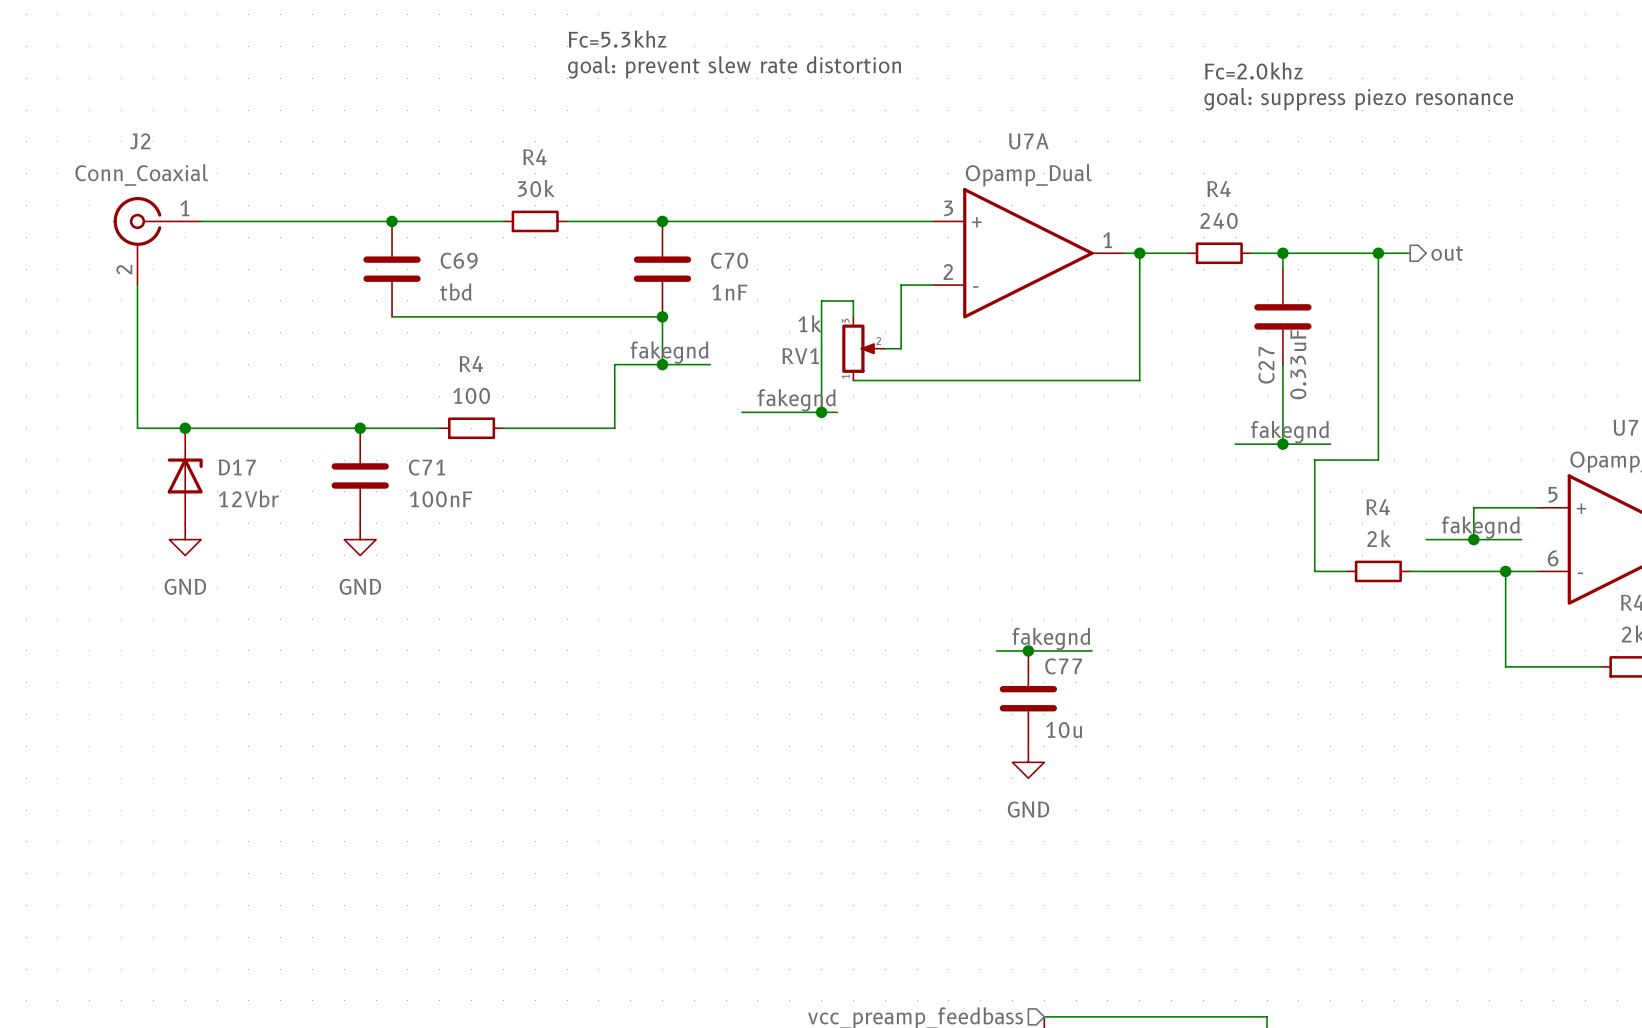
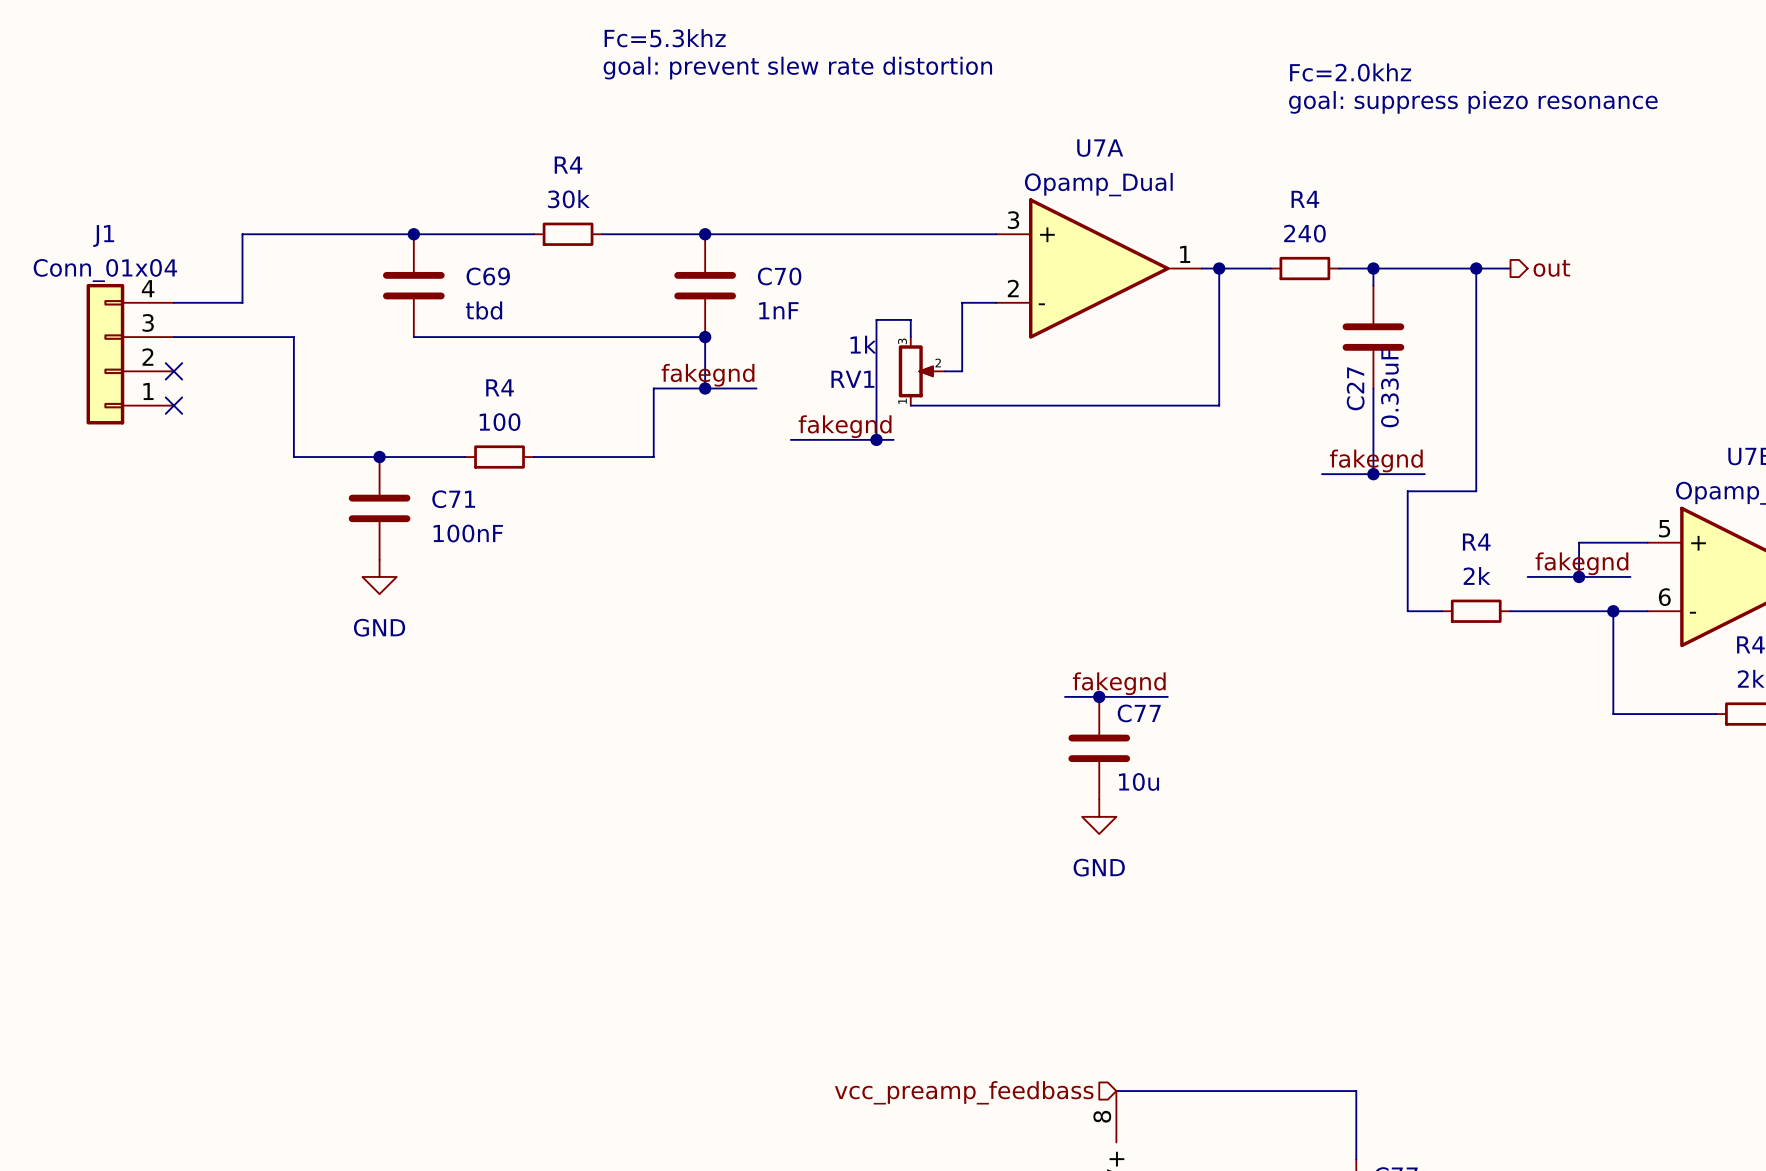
wire: (201, 221) (232, 221) -> (173, 302) (242, 302) (242, 234)
J2: Conn_Coaxial (157, 241) -> none
wire: (137, 285) (137, 428) (280, 428) -> (173, 337) (293, 337) (293, 457)
J1: none -> Conn_01x04 (130, 354)
no-connect mark: none -> (173, 371)
no-connect mark: none -> (173, 405)
junction: (185, 428) -> none
D17: 12Vbr (185, 475) -> none
power symbol: GND (185, 539) -> none

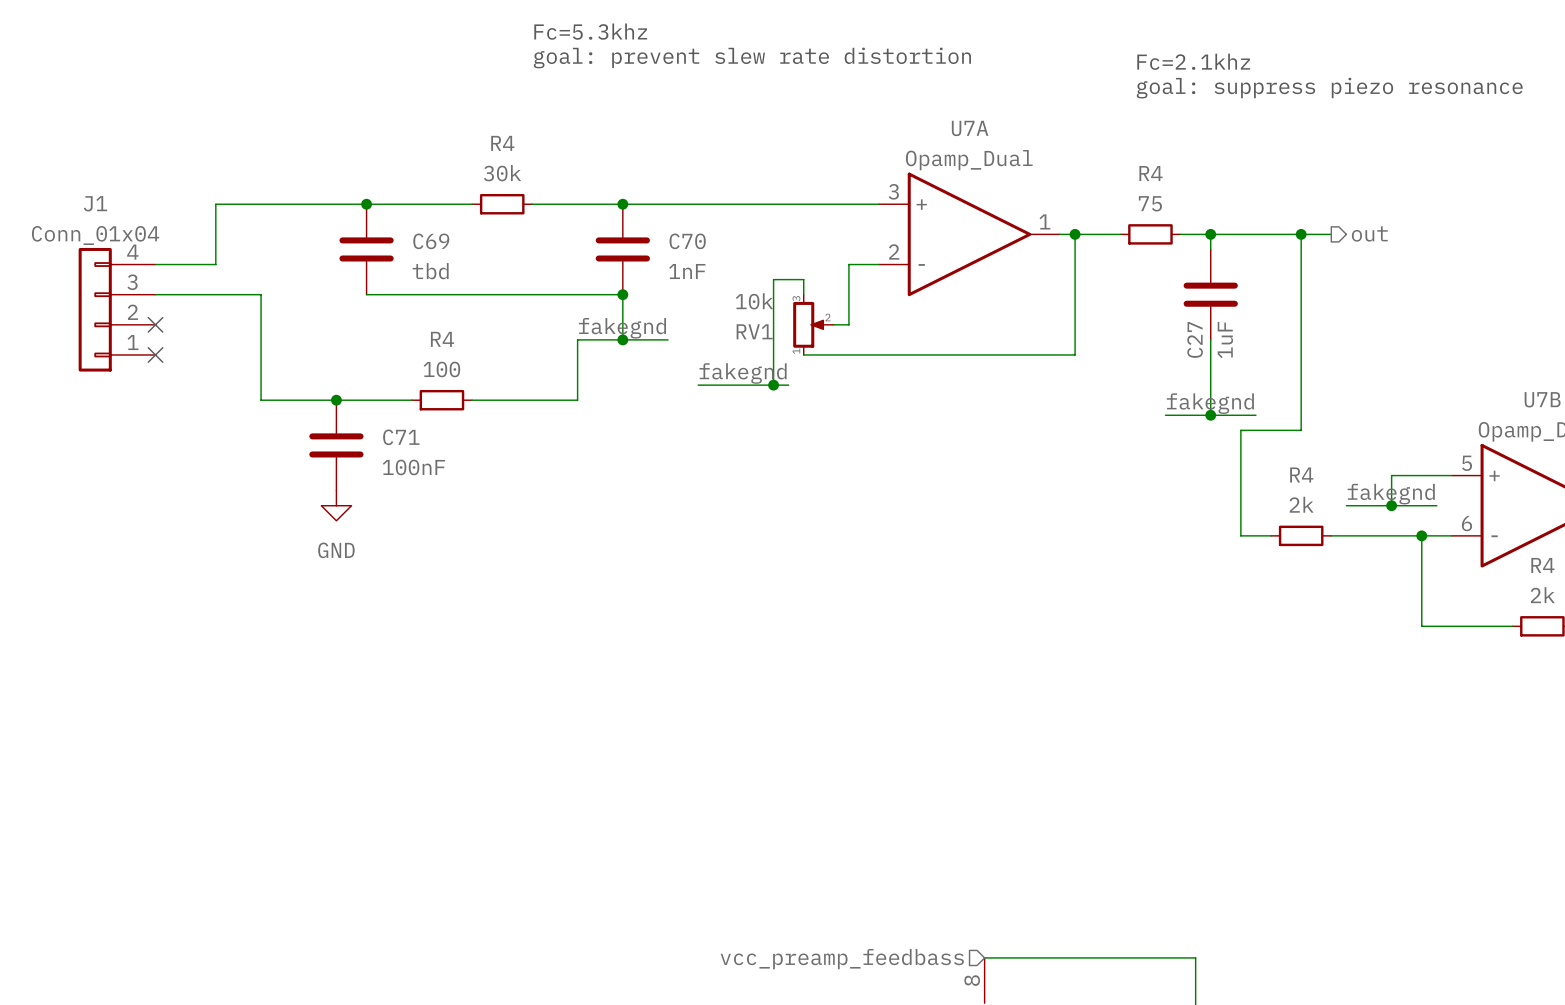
text: Fc=2.0khz (1350, 72) -> Fc=2.1khz (1193, 61)
R4 value: 240 (1304, 233) -> 75 (1150, 203)
RV1 value: 1k (863, 344) -> 10k (754, 301)
C27 value: 0.33uF (1389, 388) -> 1uF (1225, 340)
label: fakegnd (1119, 683) -> none
wire: (1064, 696) (1167, 696) -> none
junction: (1099, 696) -> none
C77: 10u (1099, 748) -> none
power symbol: GND (1099, 816) -> none

